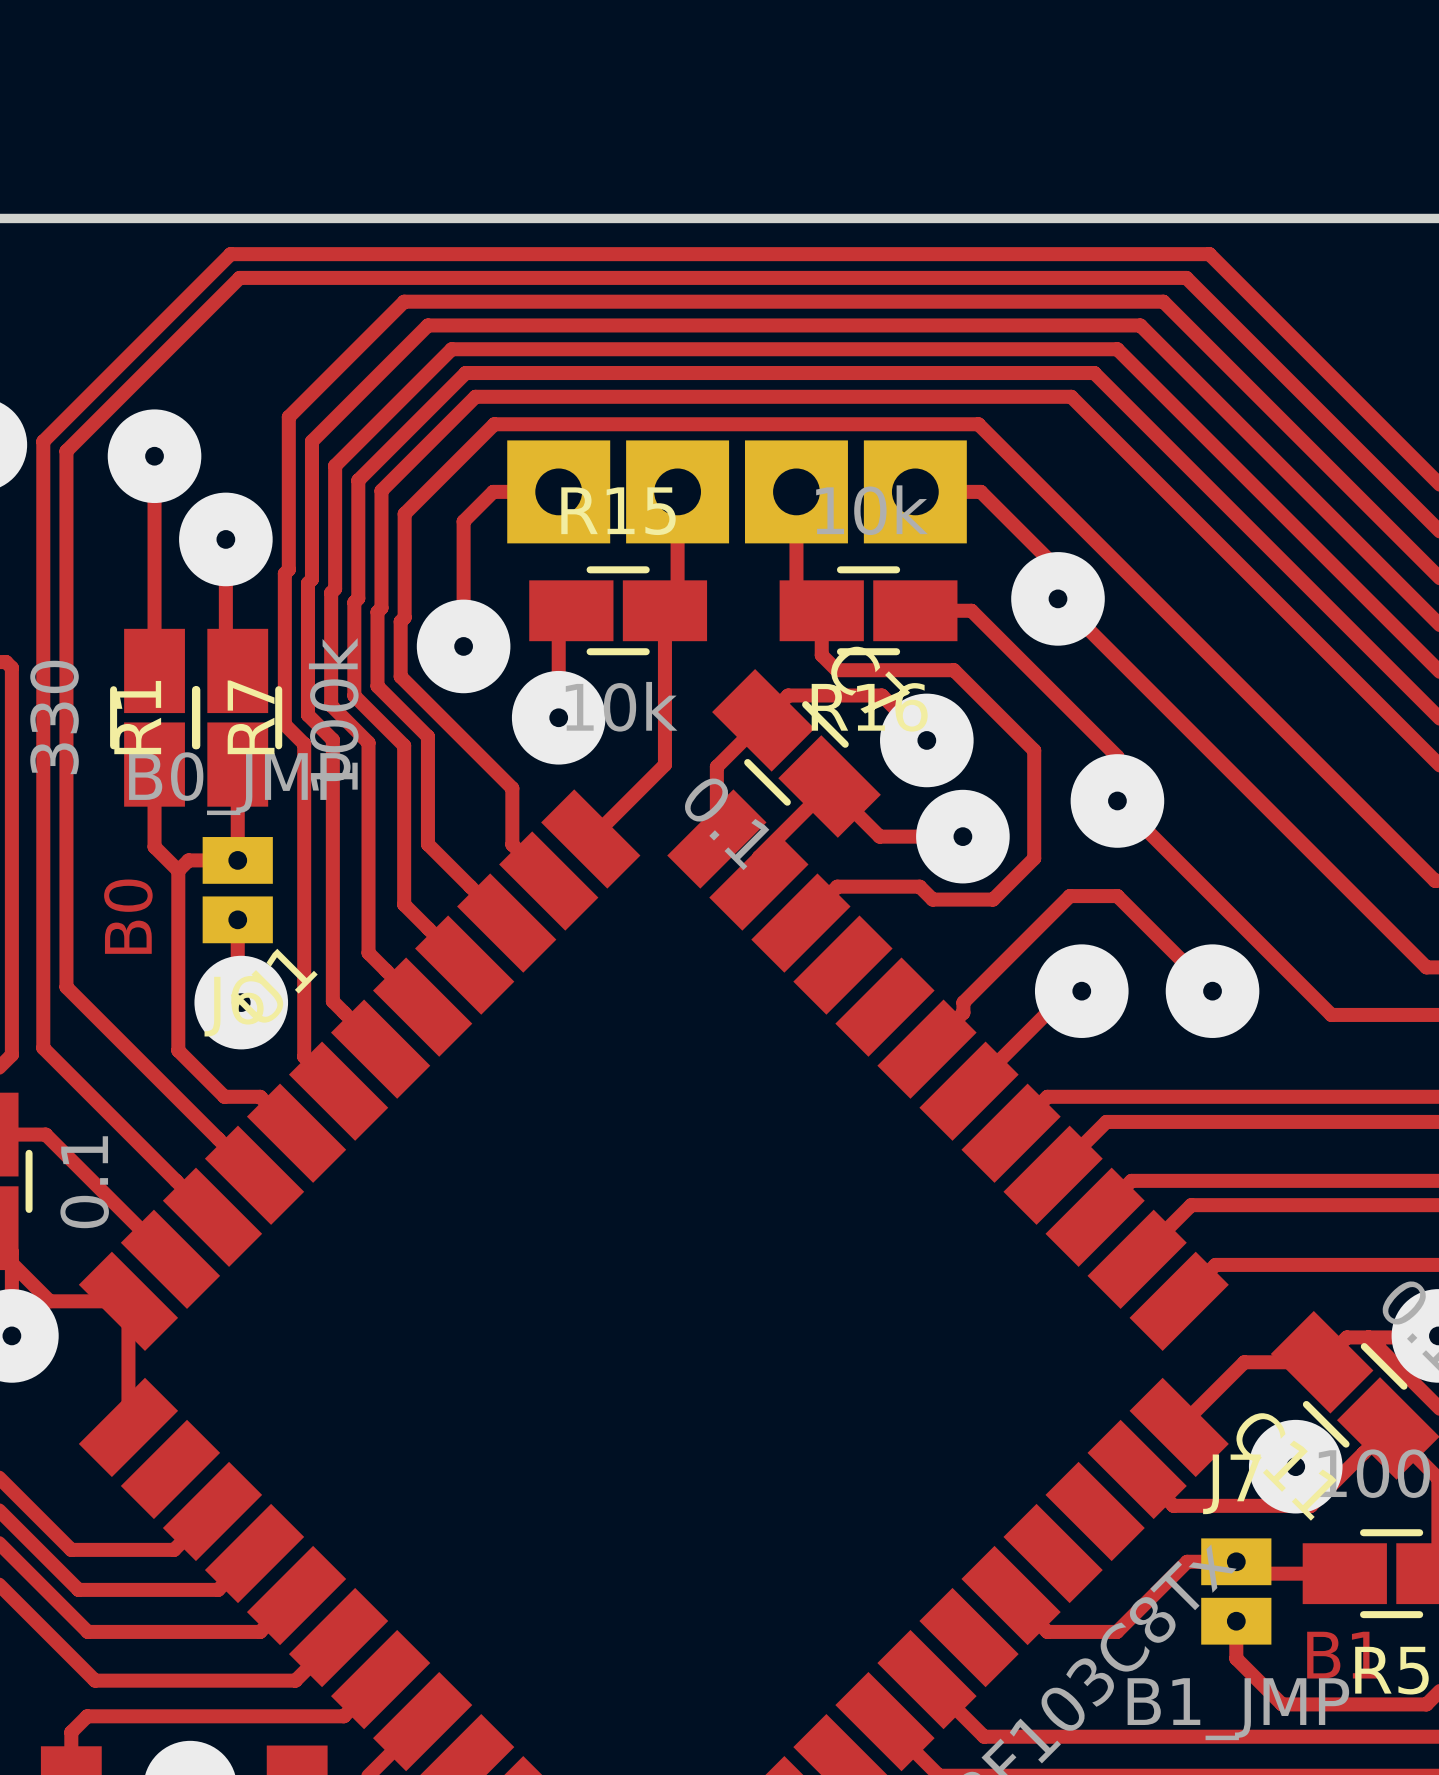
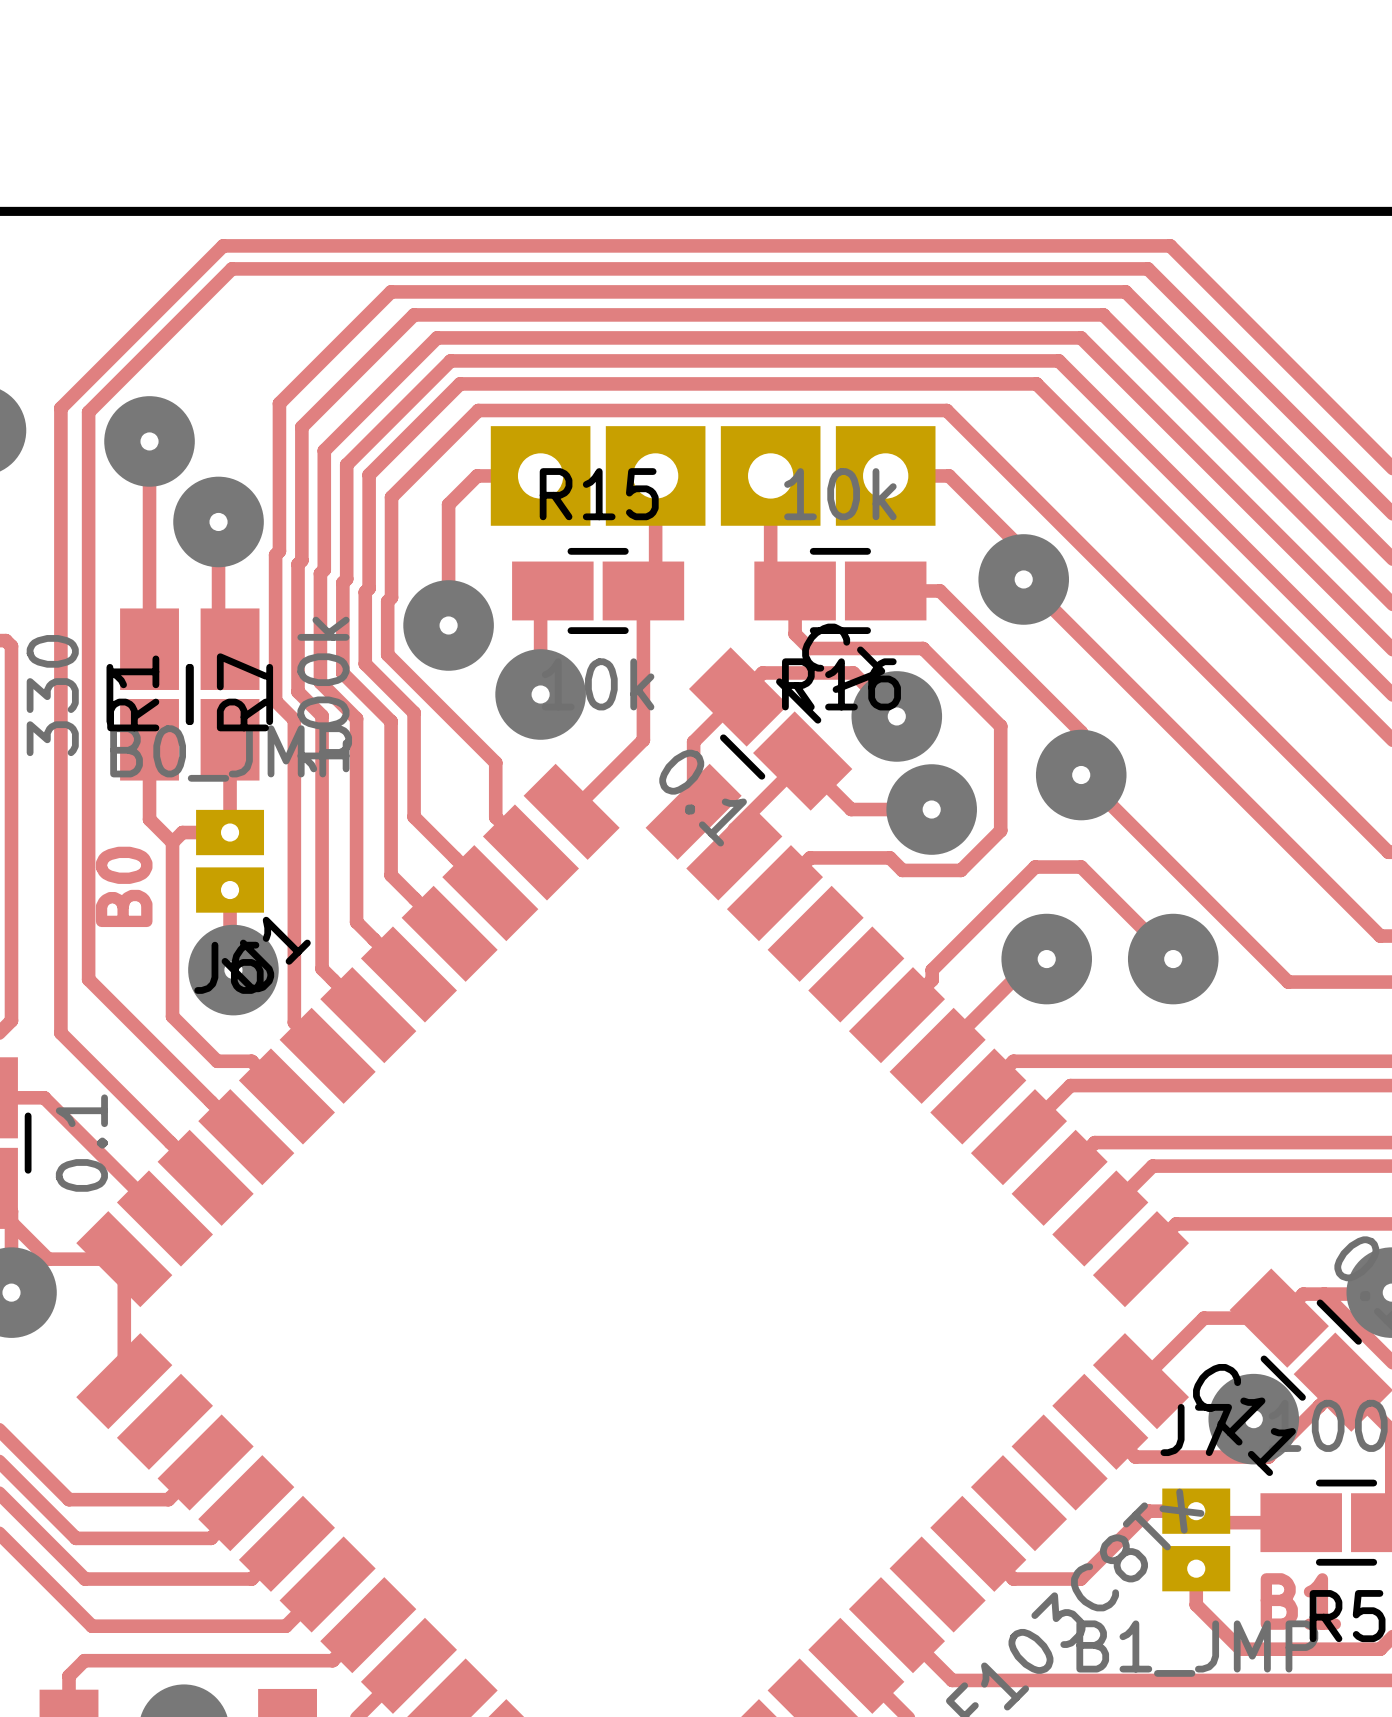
track: (62, 421) (43, 441) (43, 1048) (62, 1067) -> (60, 408) (60, 1033)
track: (91, 426) (66, 451) (66, 987) (91, 1012) -> (88, 412) (88, 979)

